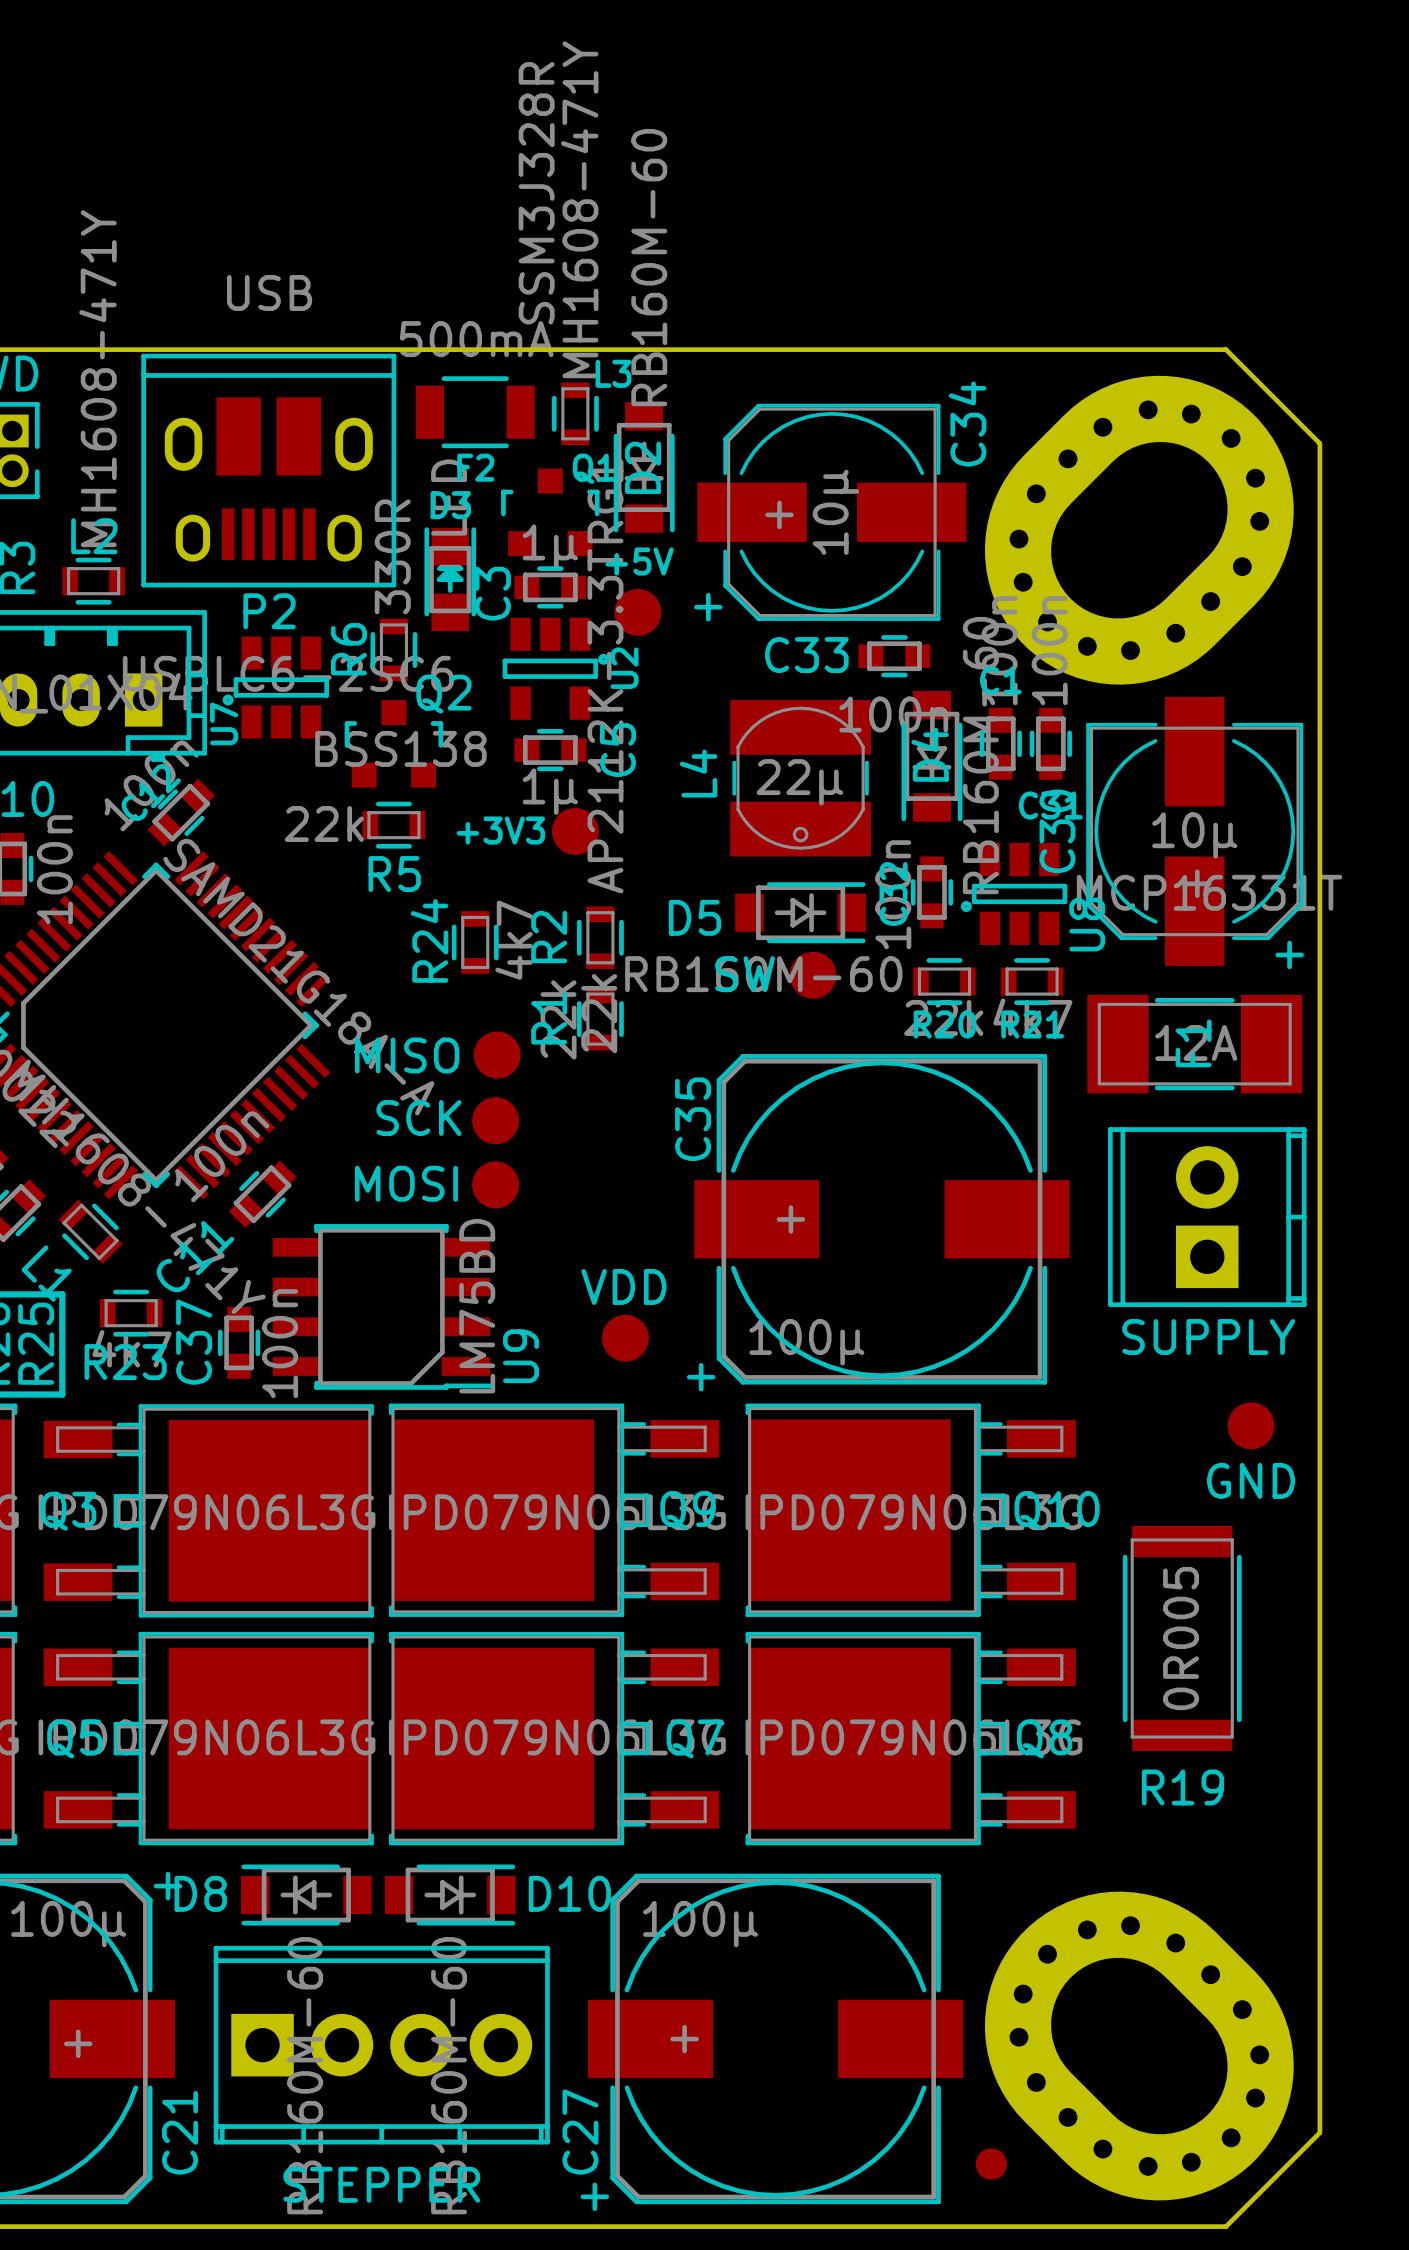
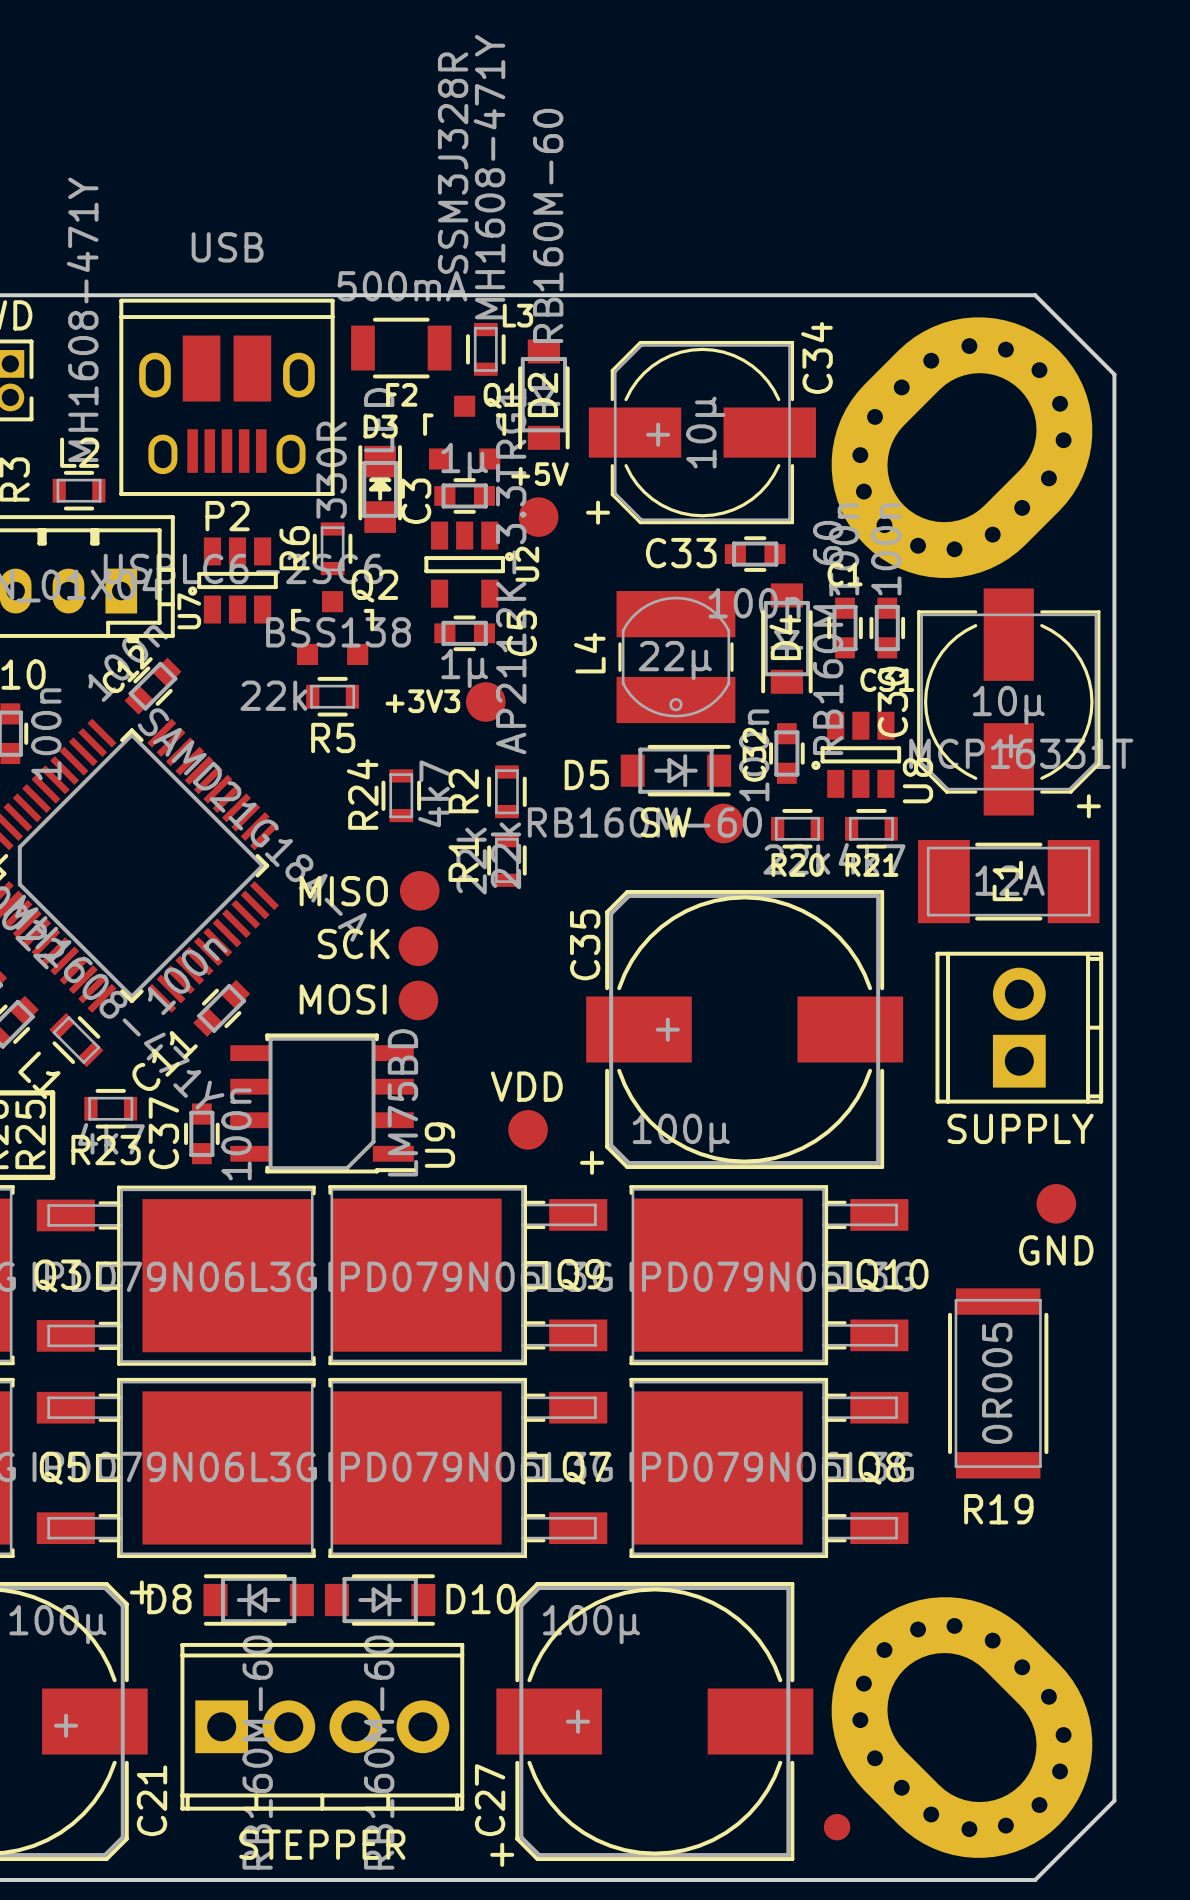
part position: (813, 975) -> (723, 823)

